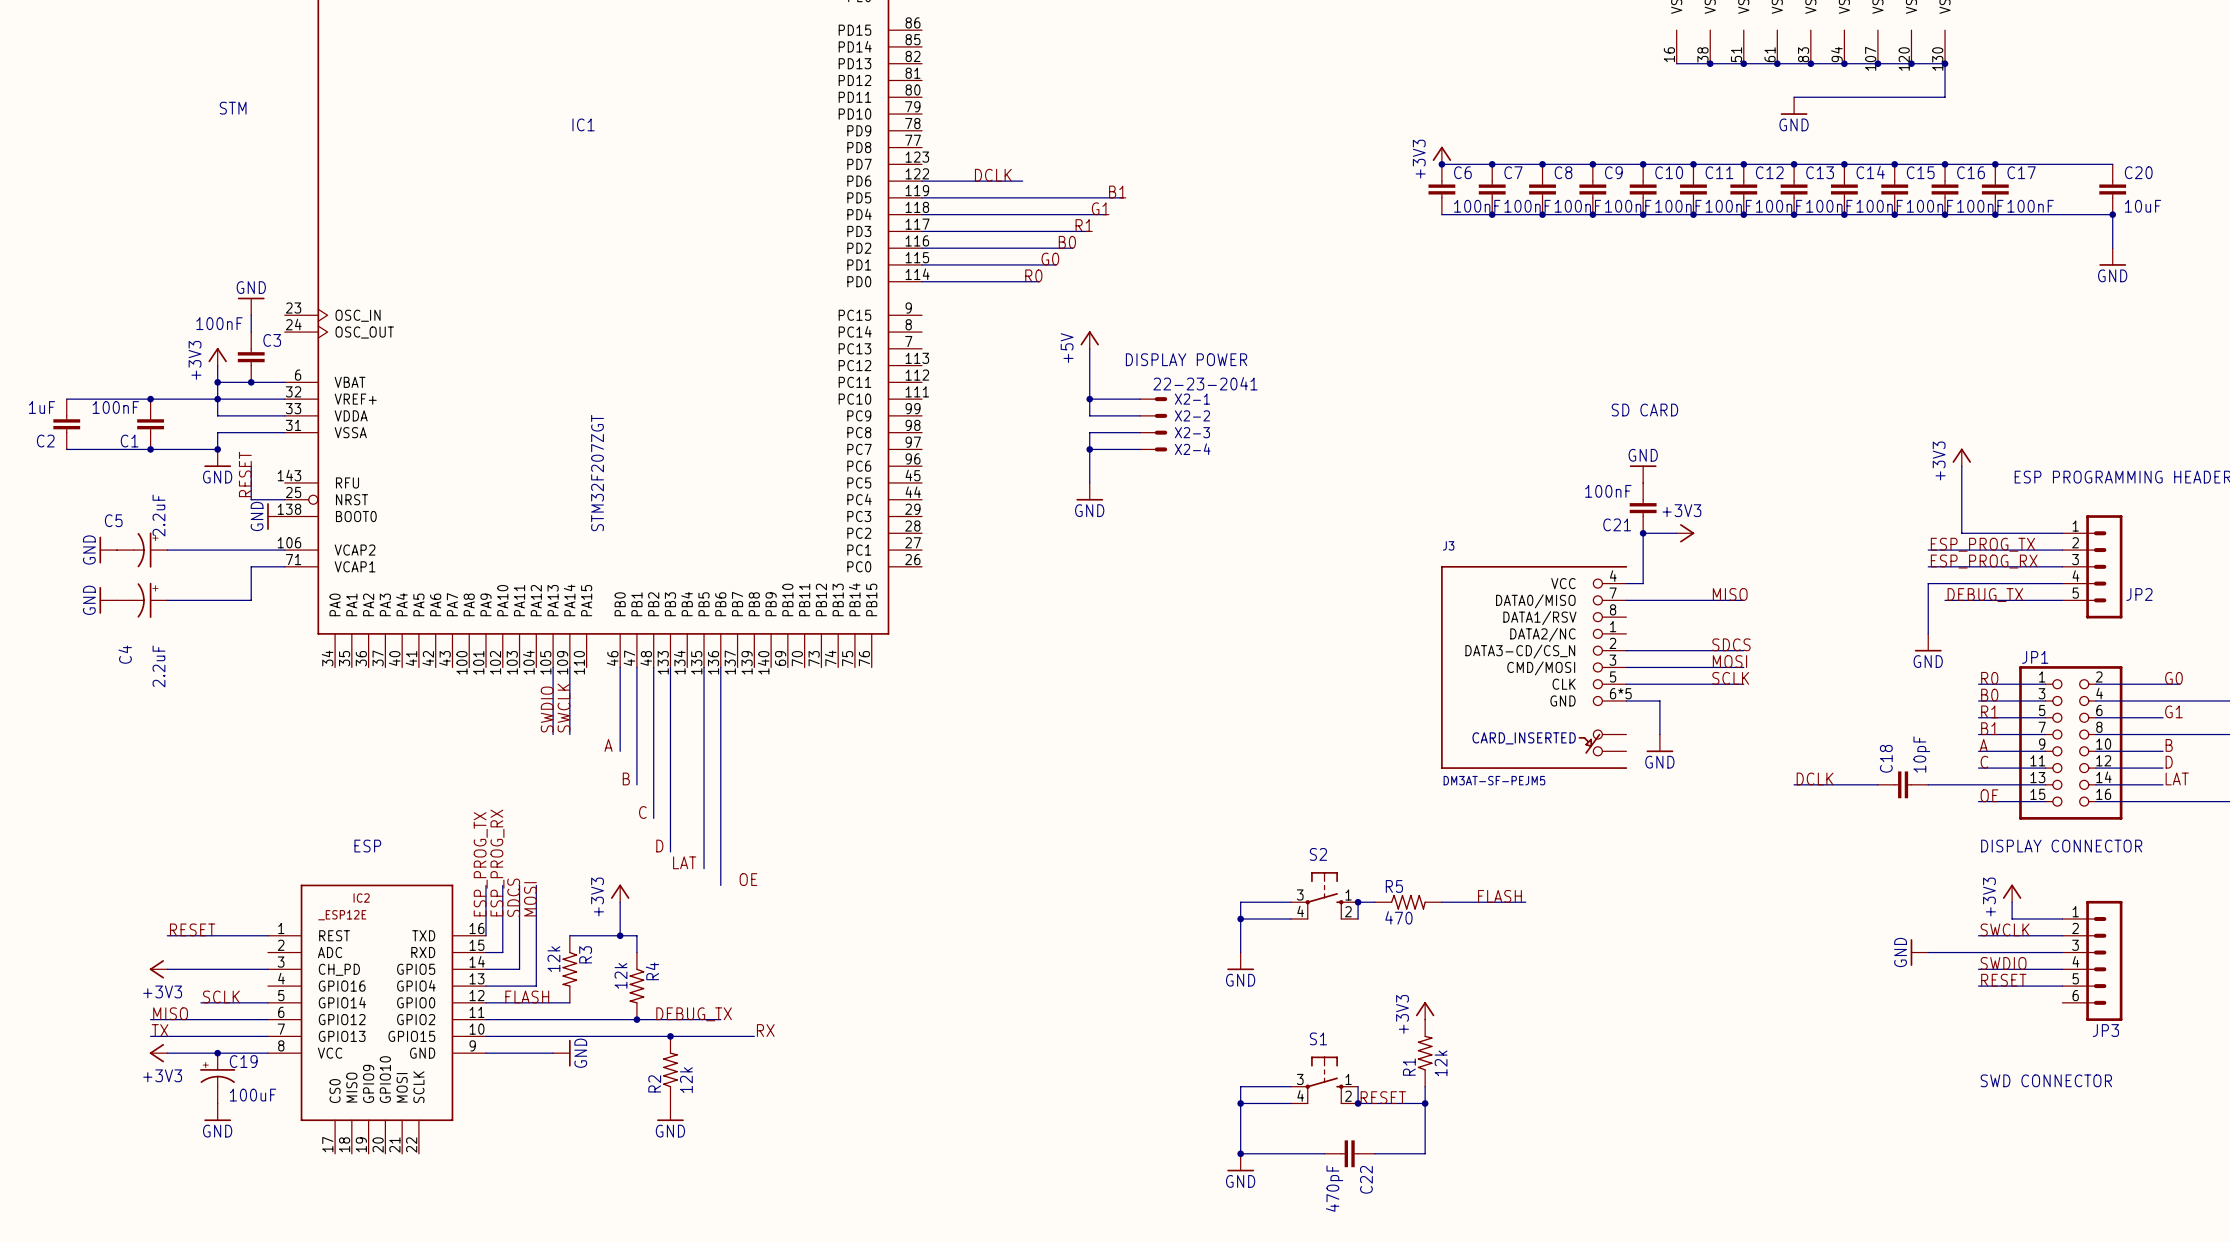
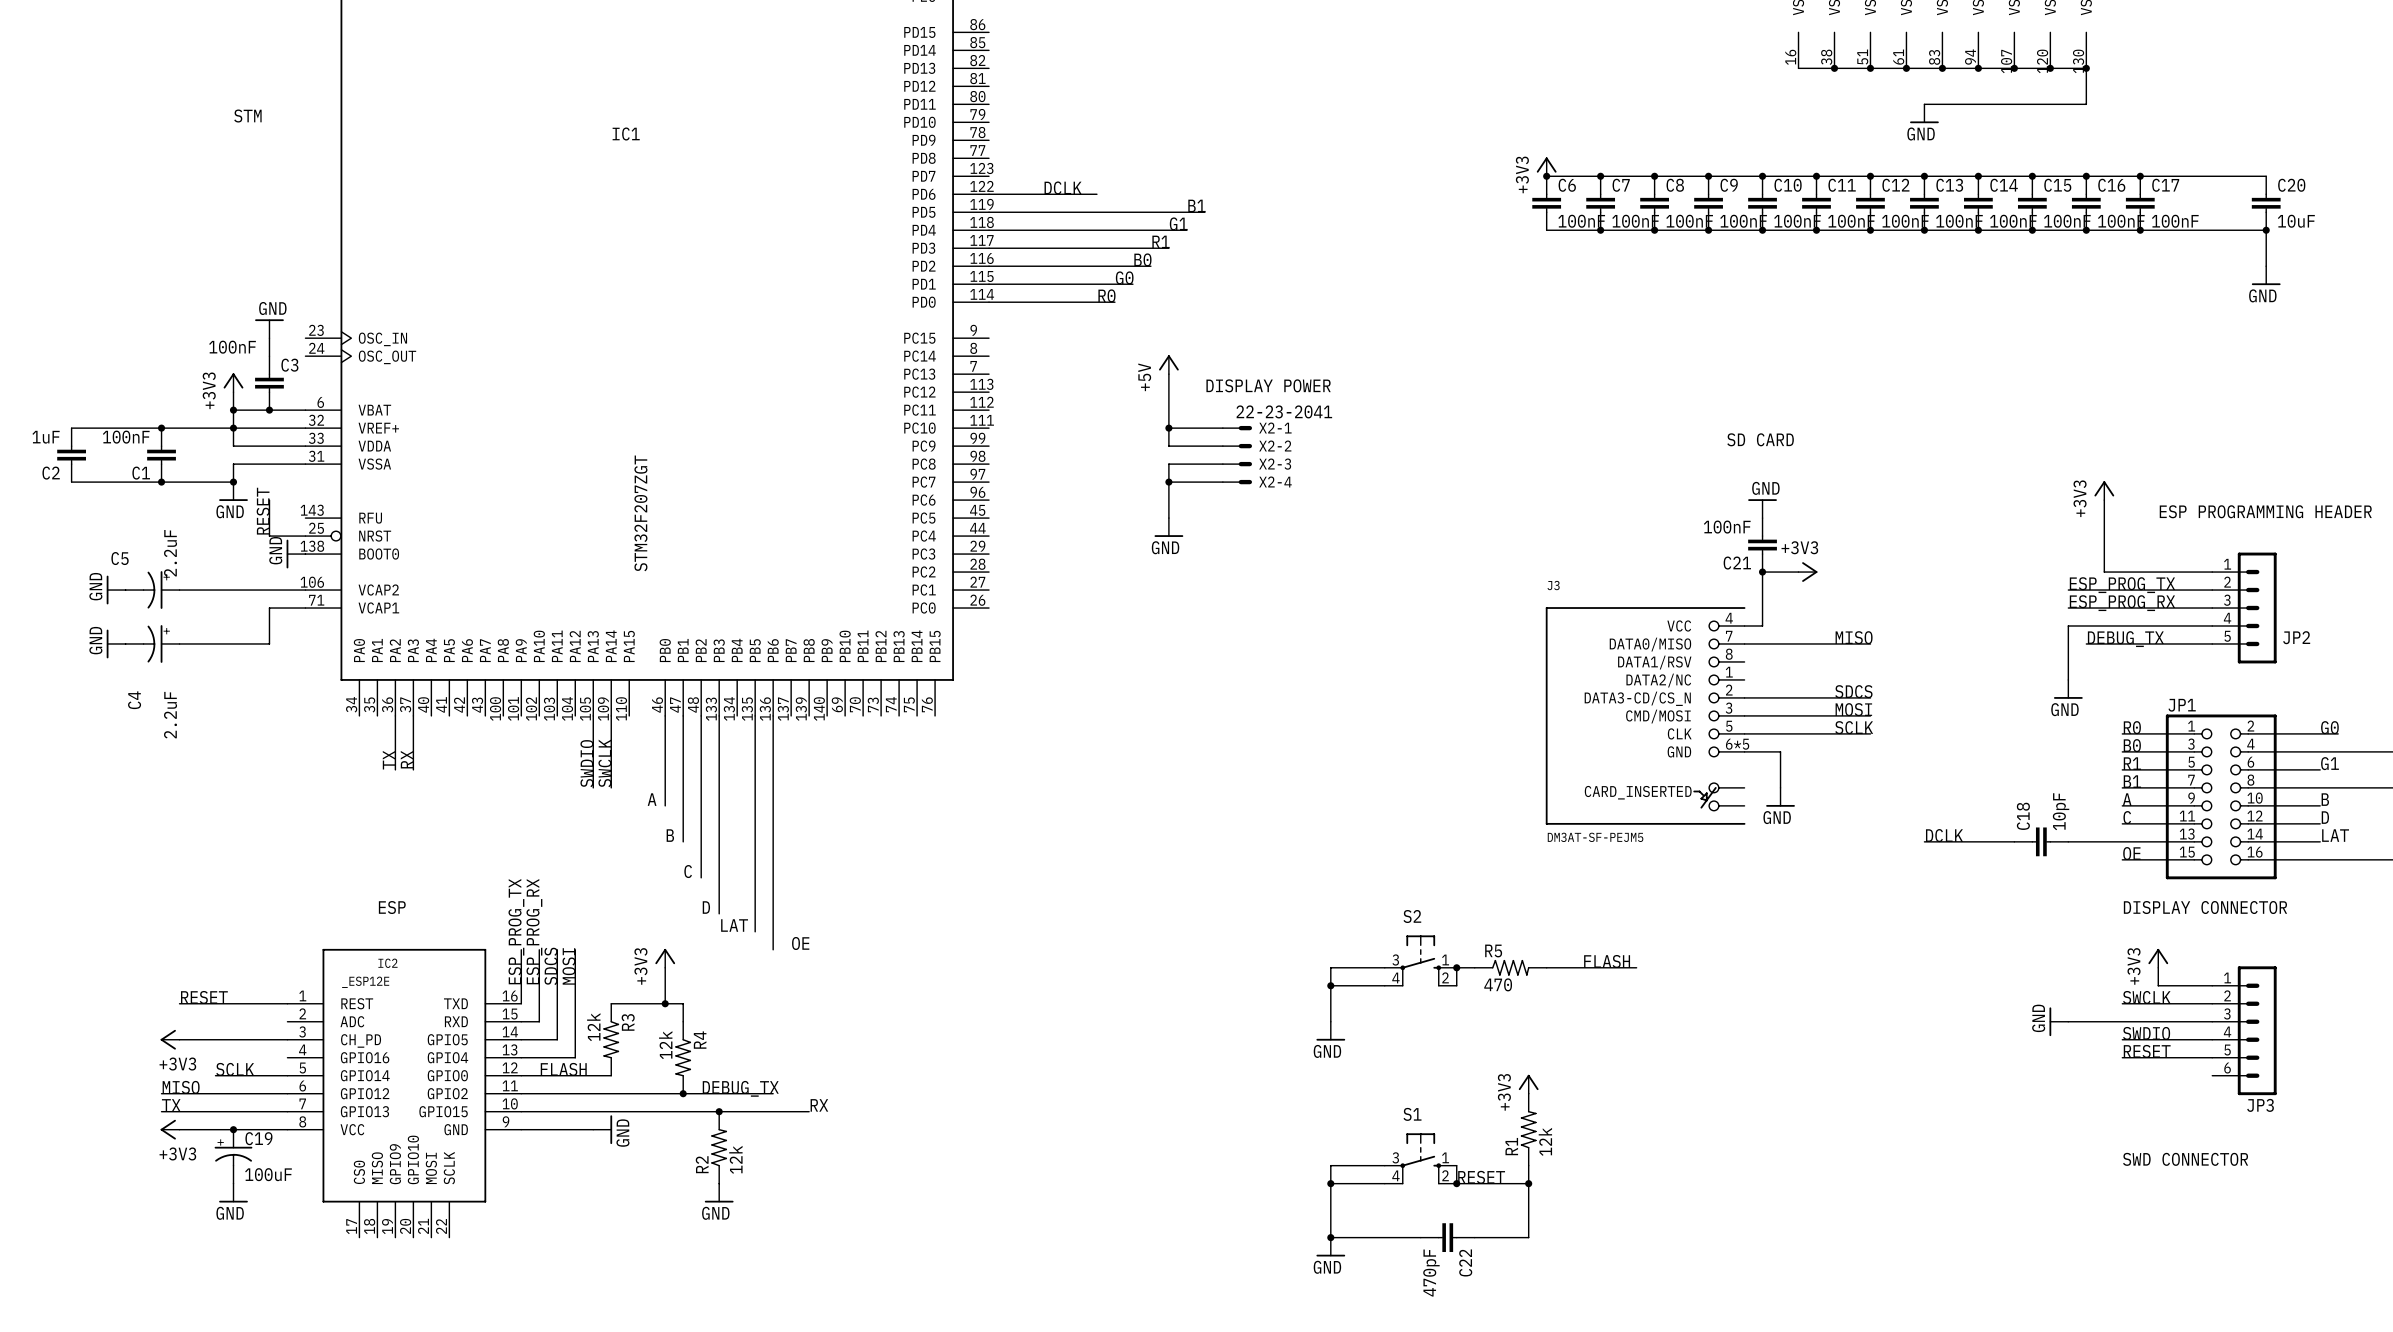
wire: none -> (395, 715) (395, 769)
wire: none -> (413, 715) (413, 769)
label: none -> RX (407, 759)
label: none -> TX (389, 760)

